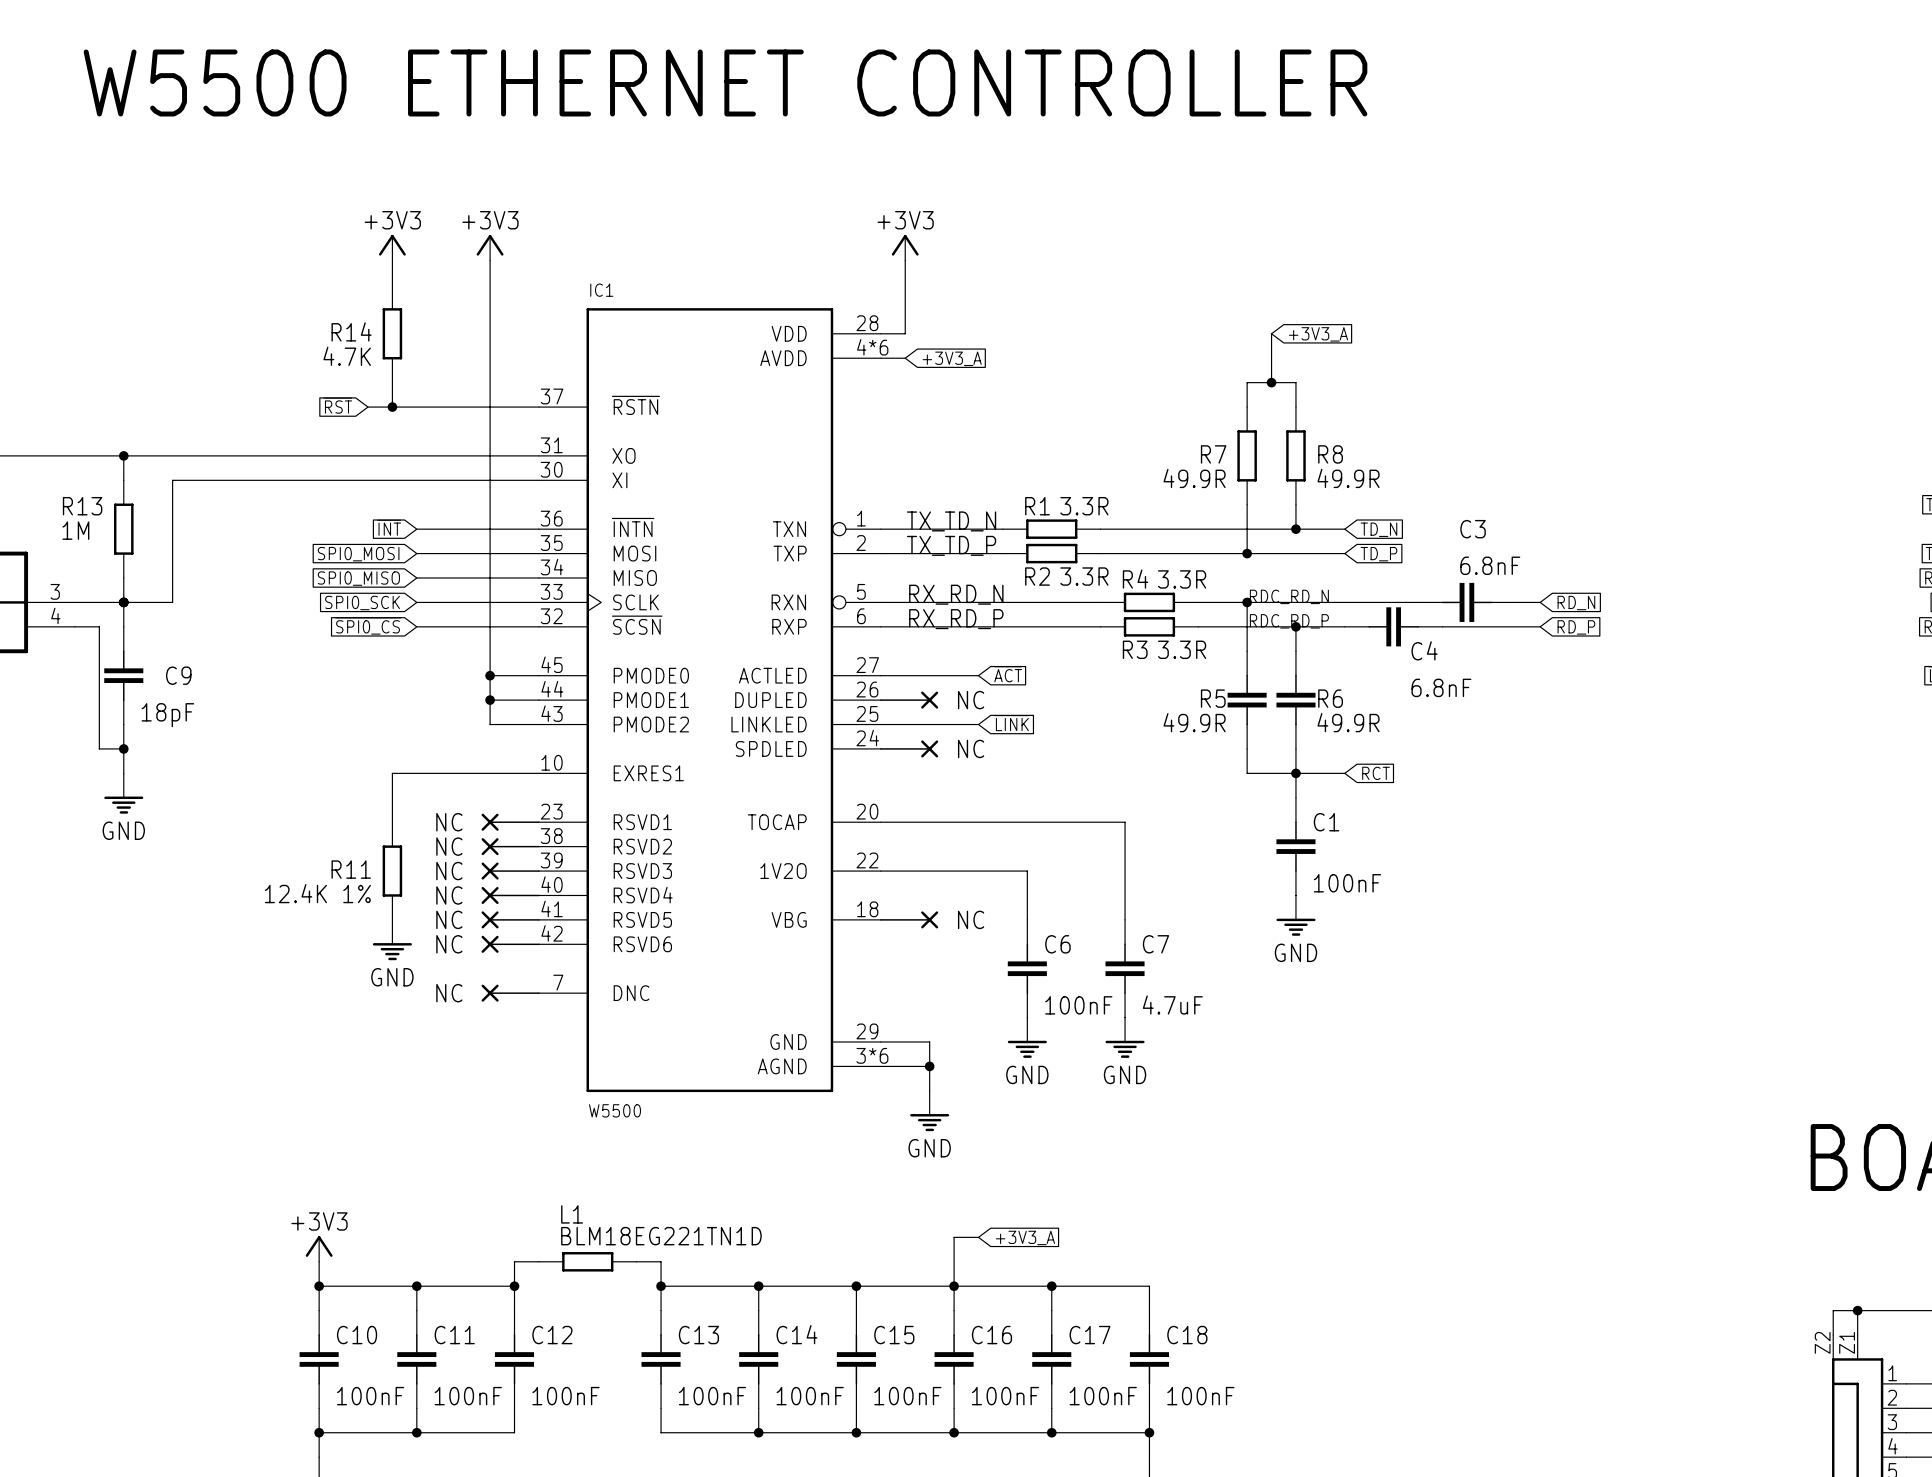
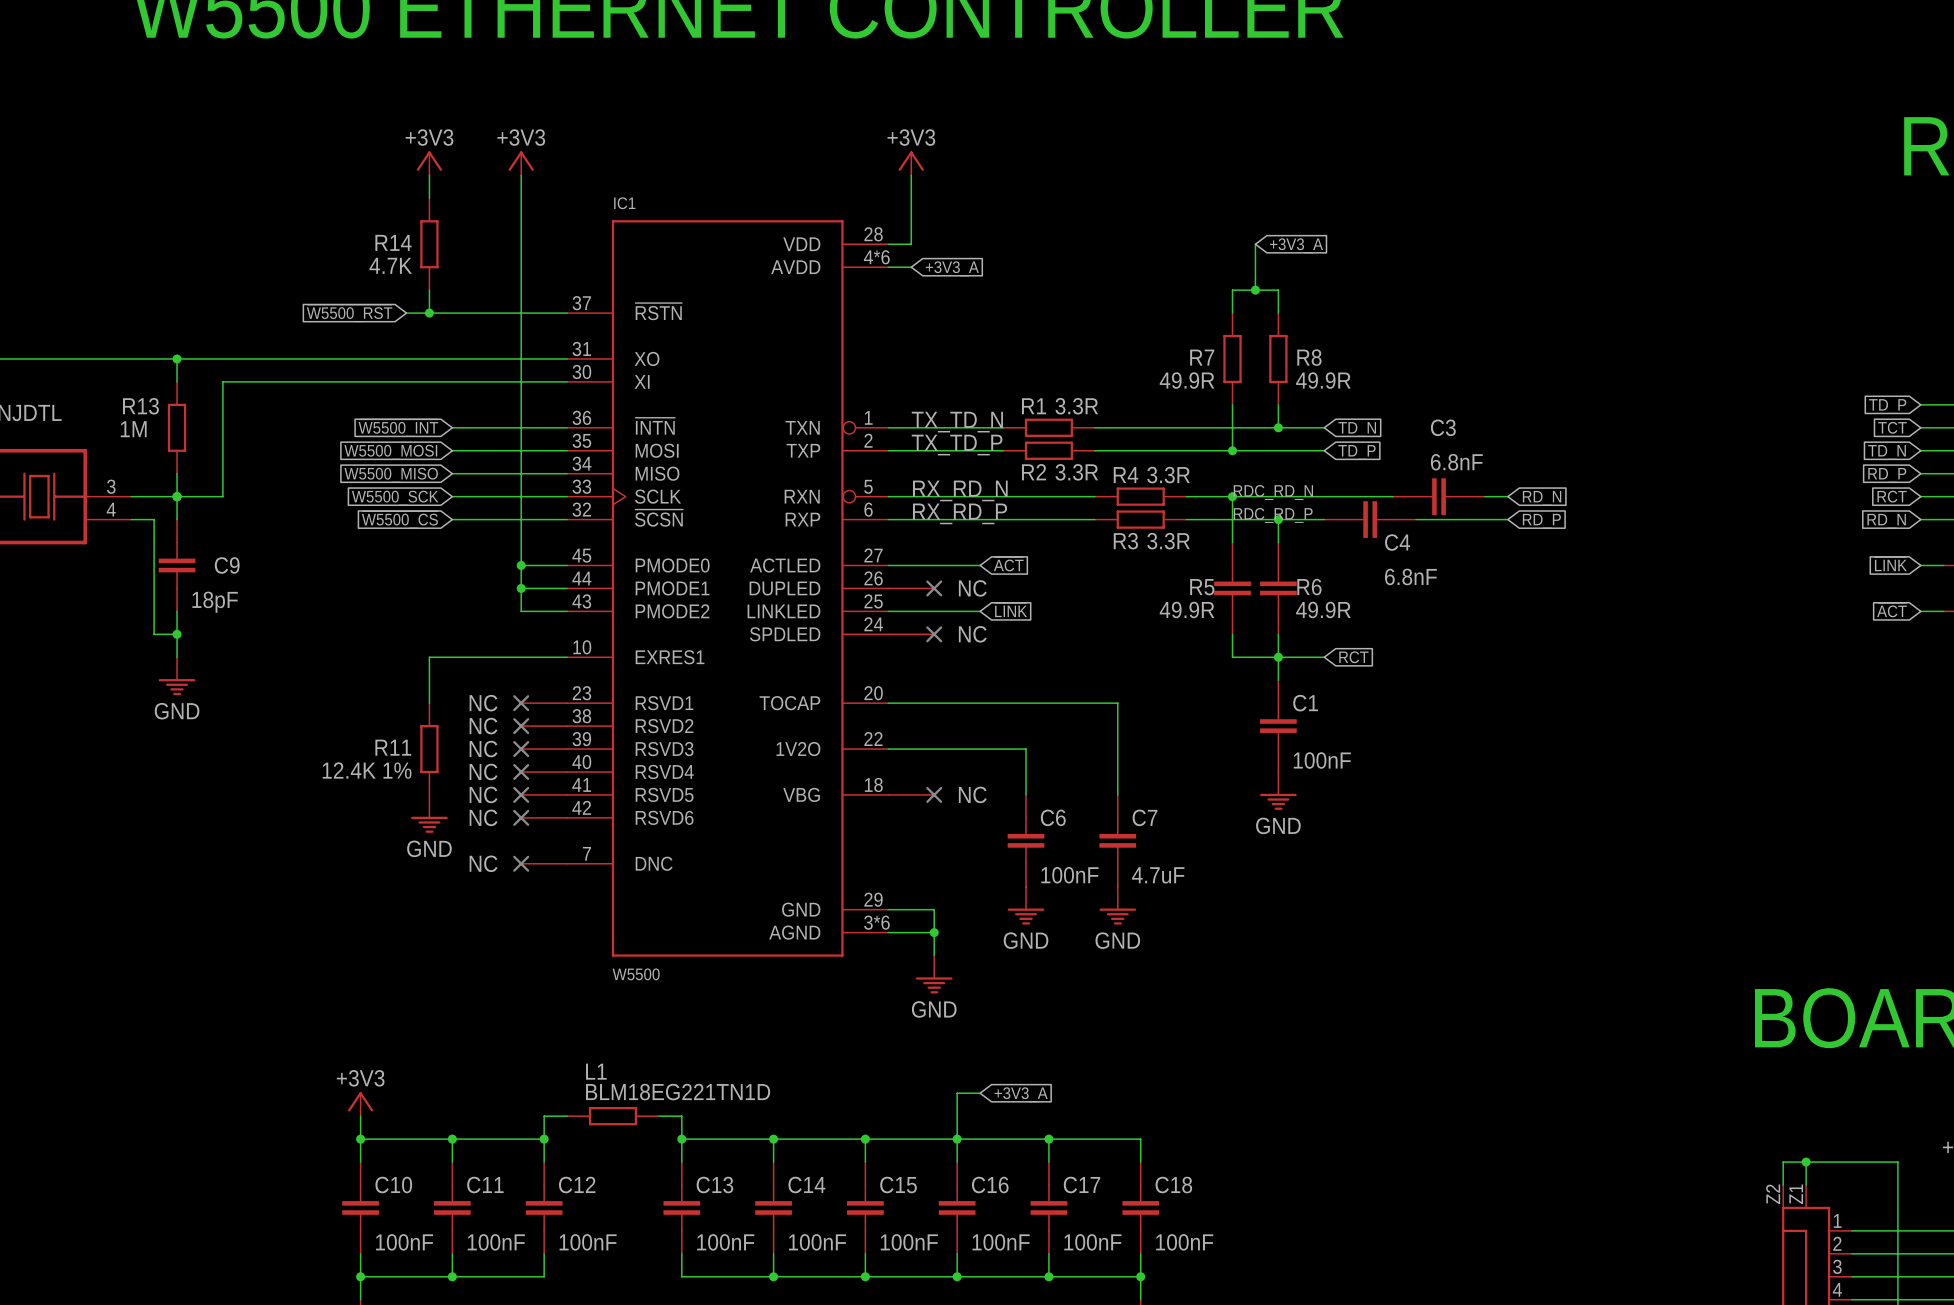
global label: ~{RST} (337, 405) -> ~{W5500_RST} (349, 313)
global label: ~{INT} (388, 527) -> ~{W5500_INT} (398, 428)
global label: SPI0_MOSI (358, 554) -> W5500_MOSI (390, 452)
global label: SPI0_MISO (358, 578) -> W5500_MISO (391, 475)
global label: SPI0_SCK (362, 603) -> W5500_SCK (395, 498)
global label: ~{SPI0_CS} (368, 626) -> ~{W5500_CS} (399, 519)

